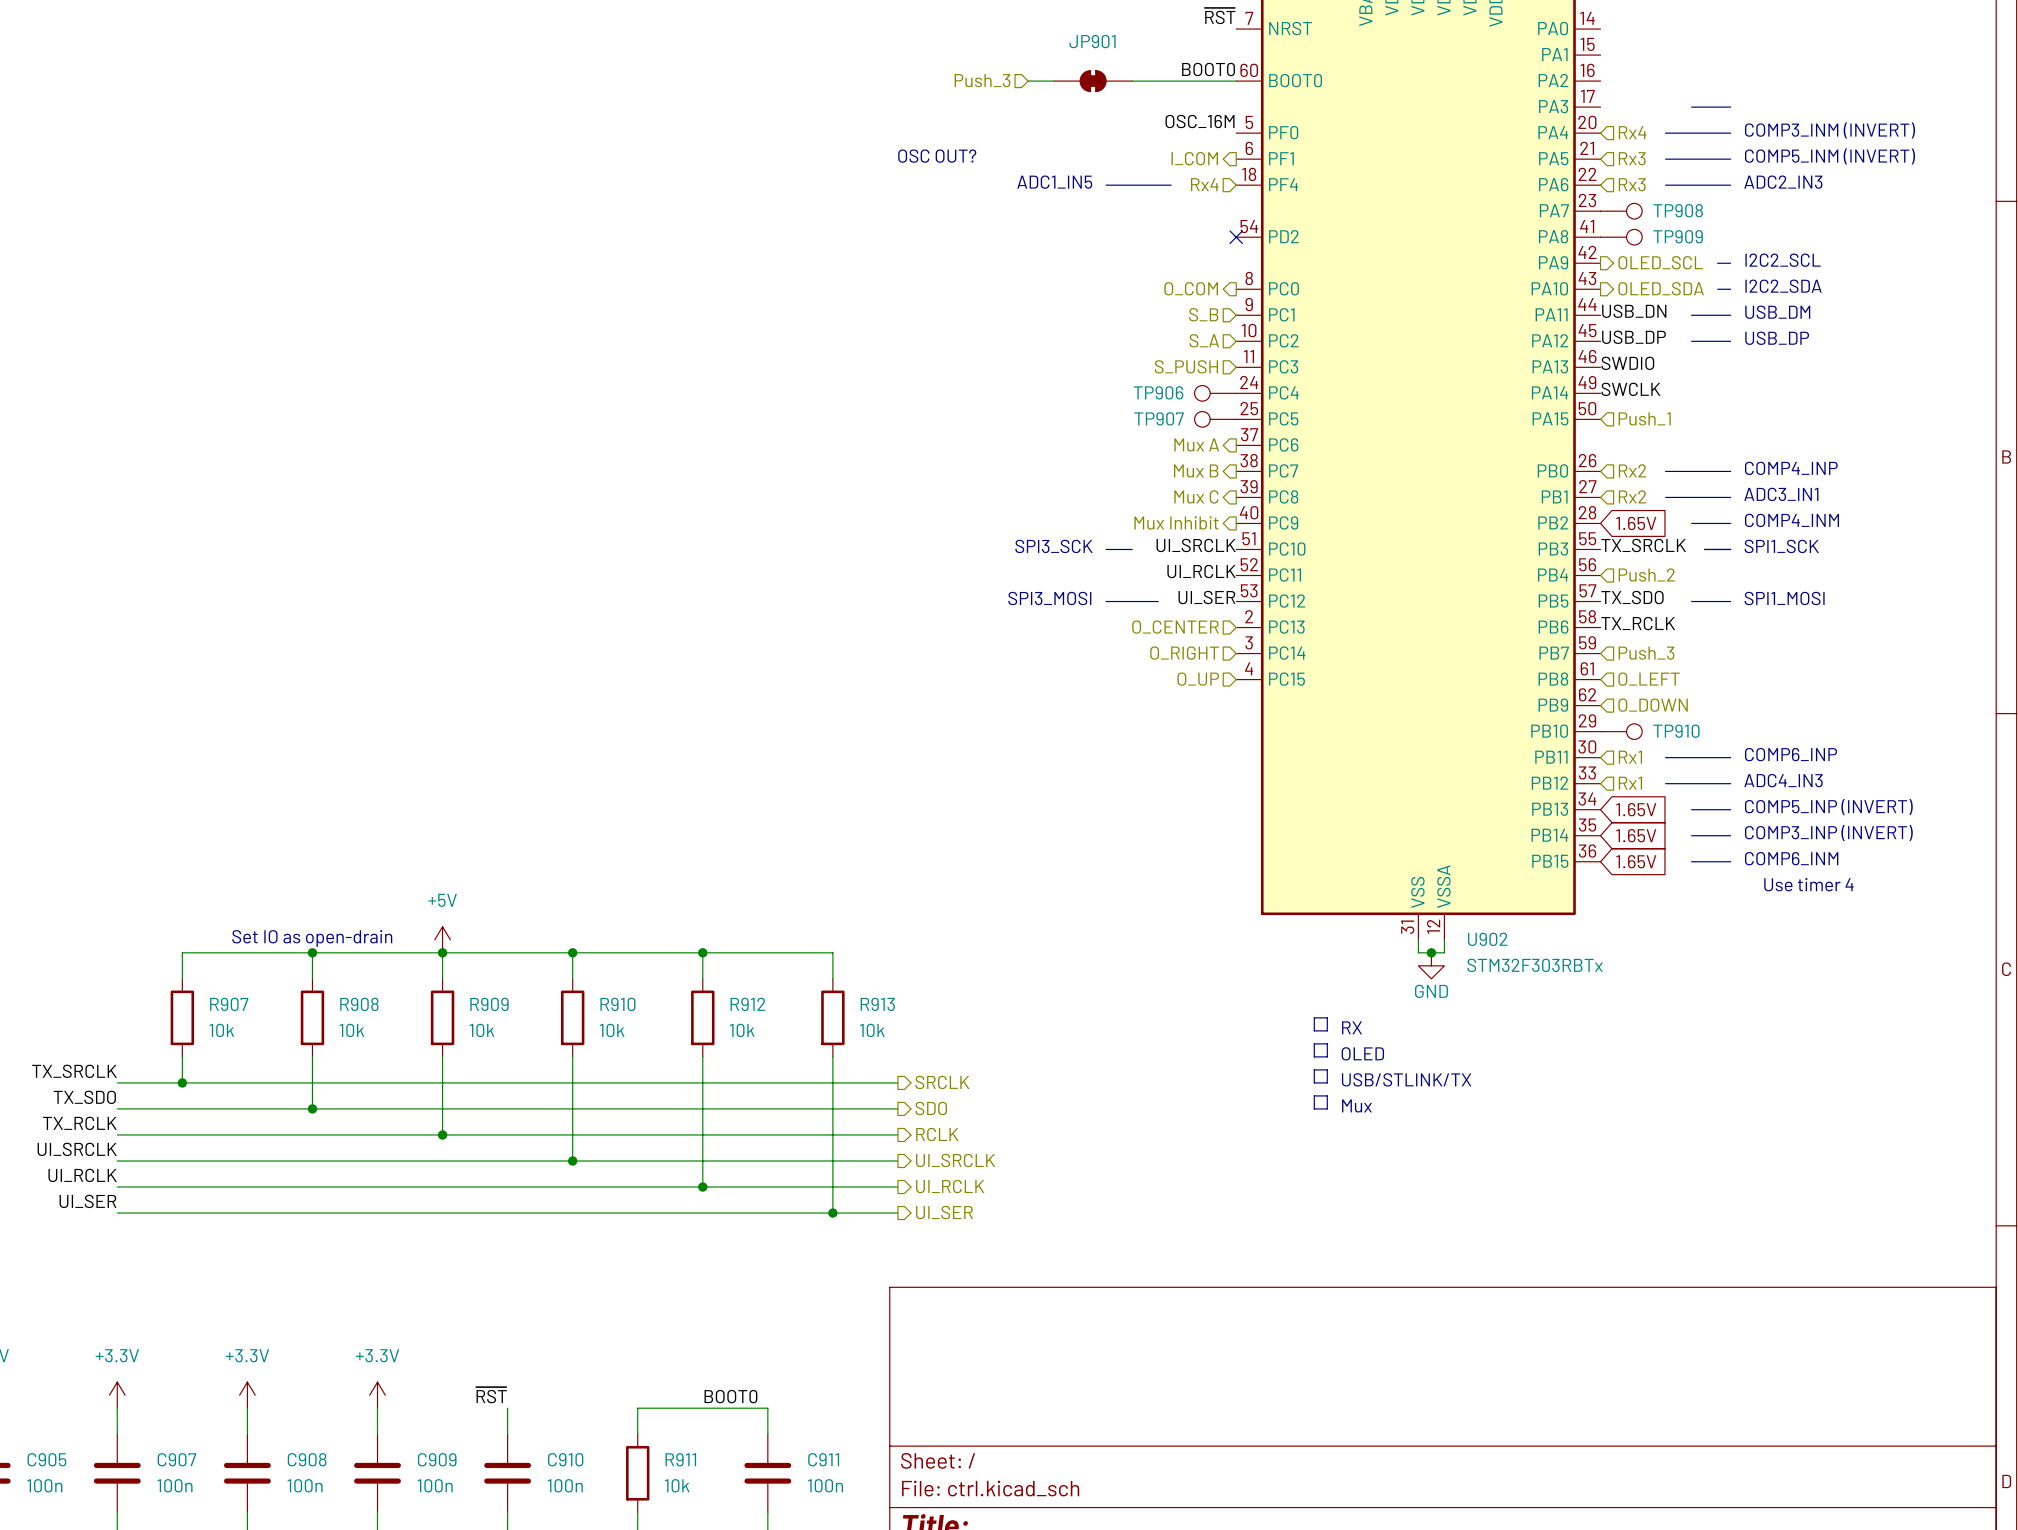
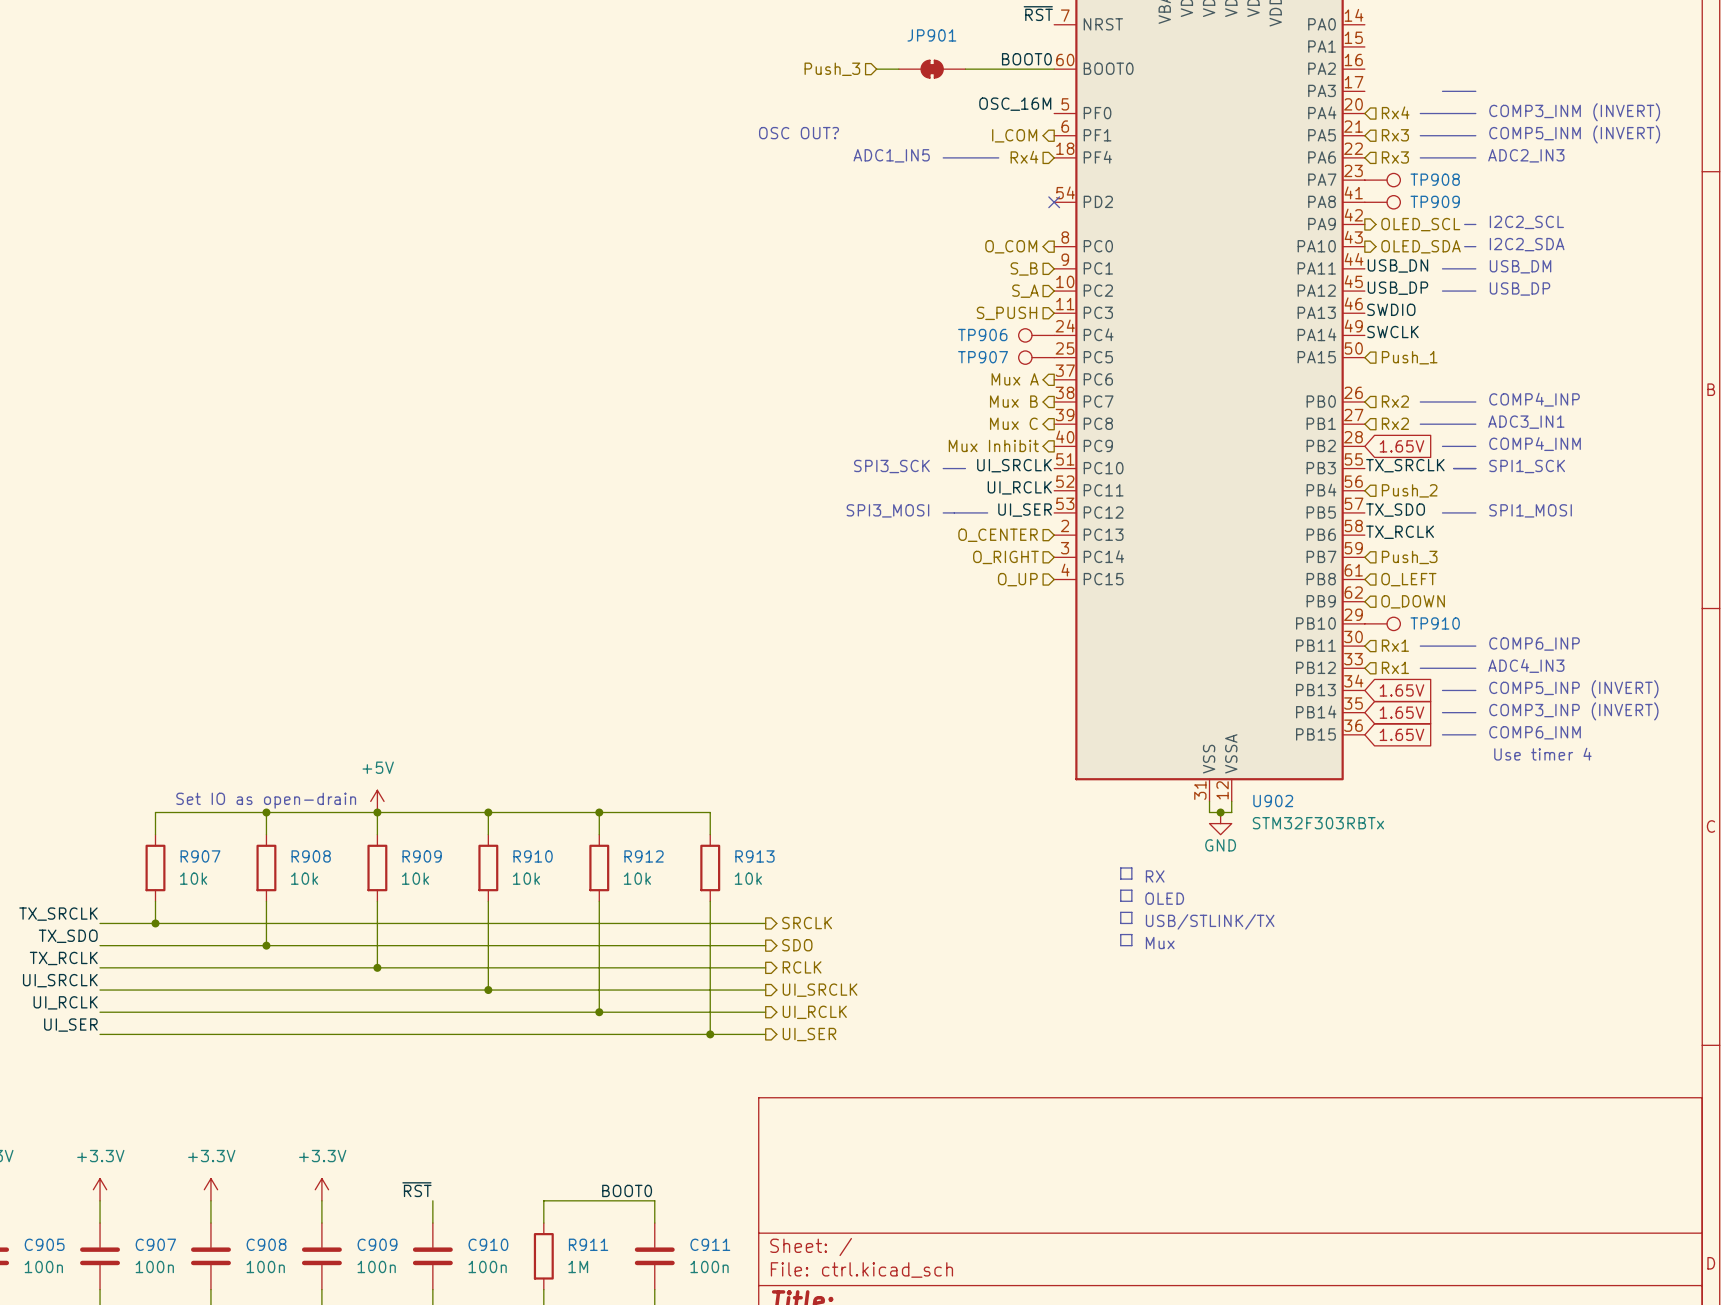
R911 value: 10k (677, 1485) -> 1M (578, 1266)

